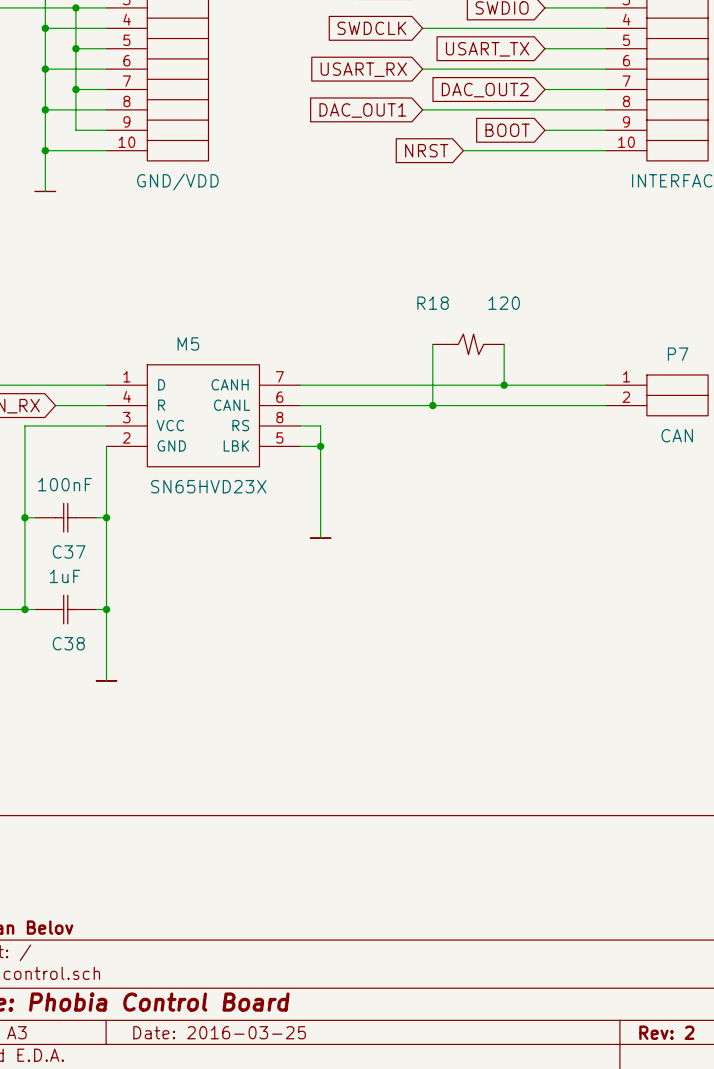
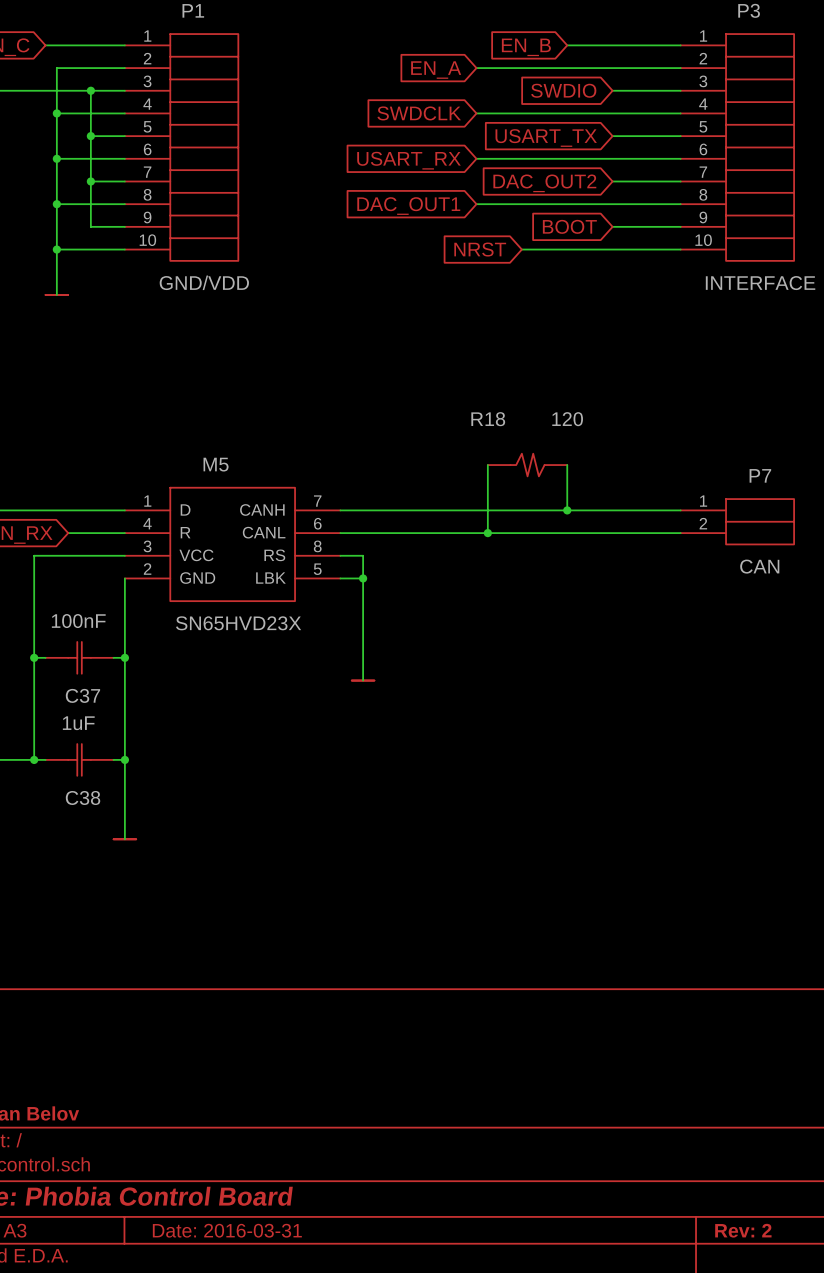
title block: Date: 2016-03-25 (219, 1032) -> Date: 2016-03-31 (227, 1230)

